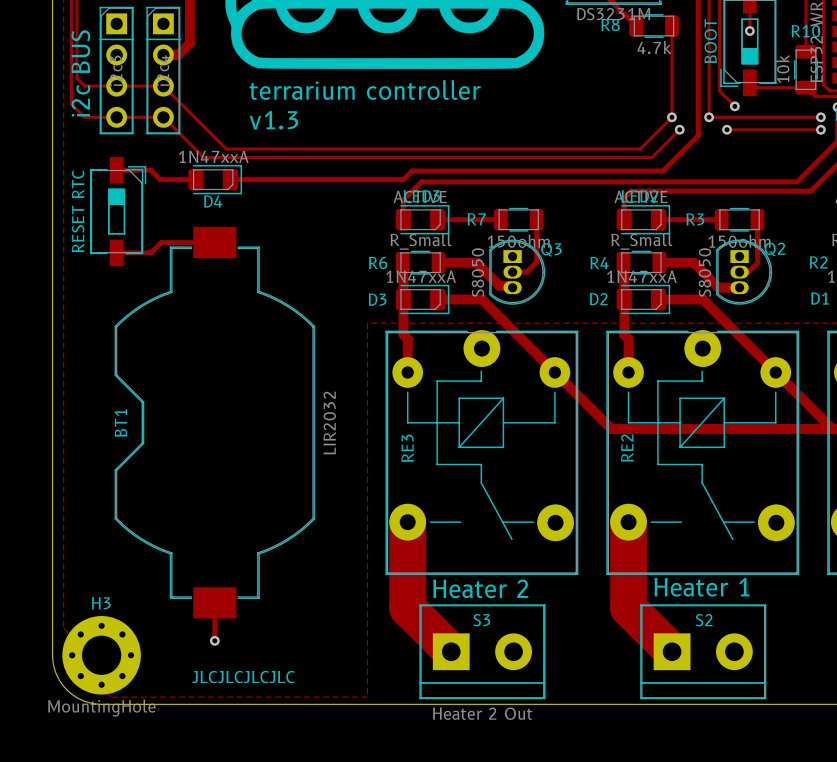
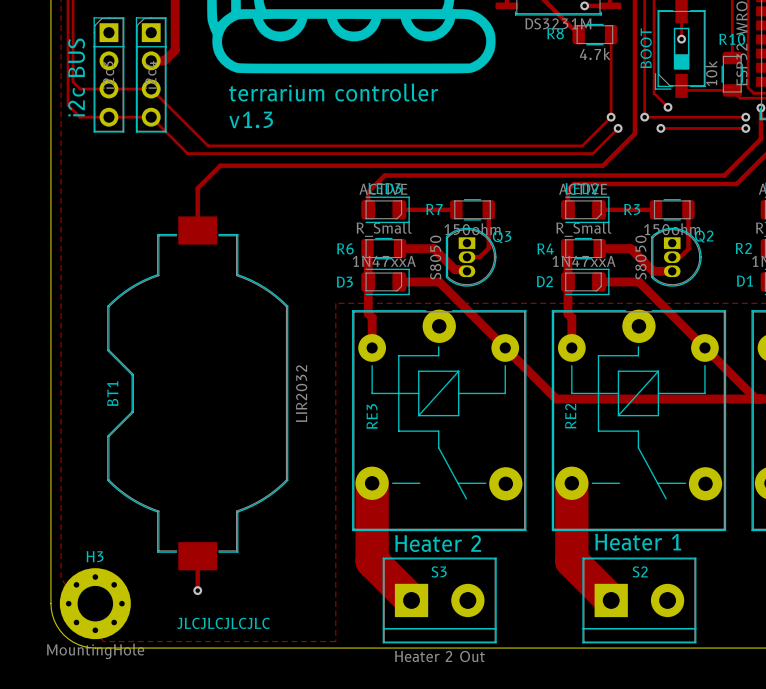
track: (116, 170) (150, 170) (160, 179) (196, 179) -> none
track: (412, 170) (403, 179) (230, 179) -> (376, 165) (220, 165) (197, 188) (197, 230)
D4: 1N47xxA (215, 179) -> none
part: RESET RTC (118, 211) -> none
track: (214, 242) (161, 242) (150, 252) (116, 252) -> none

